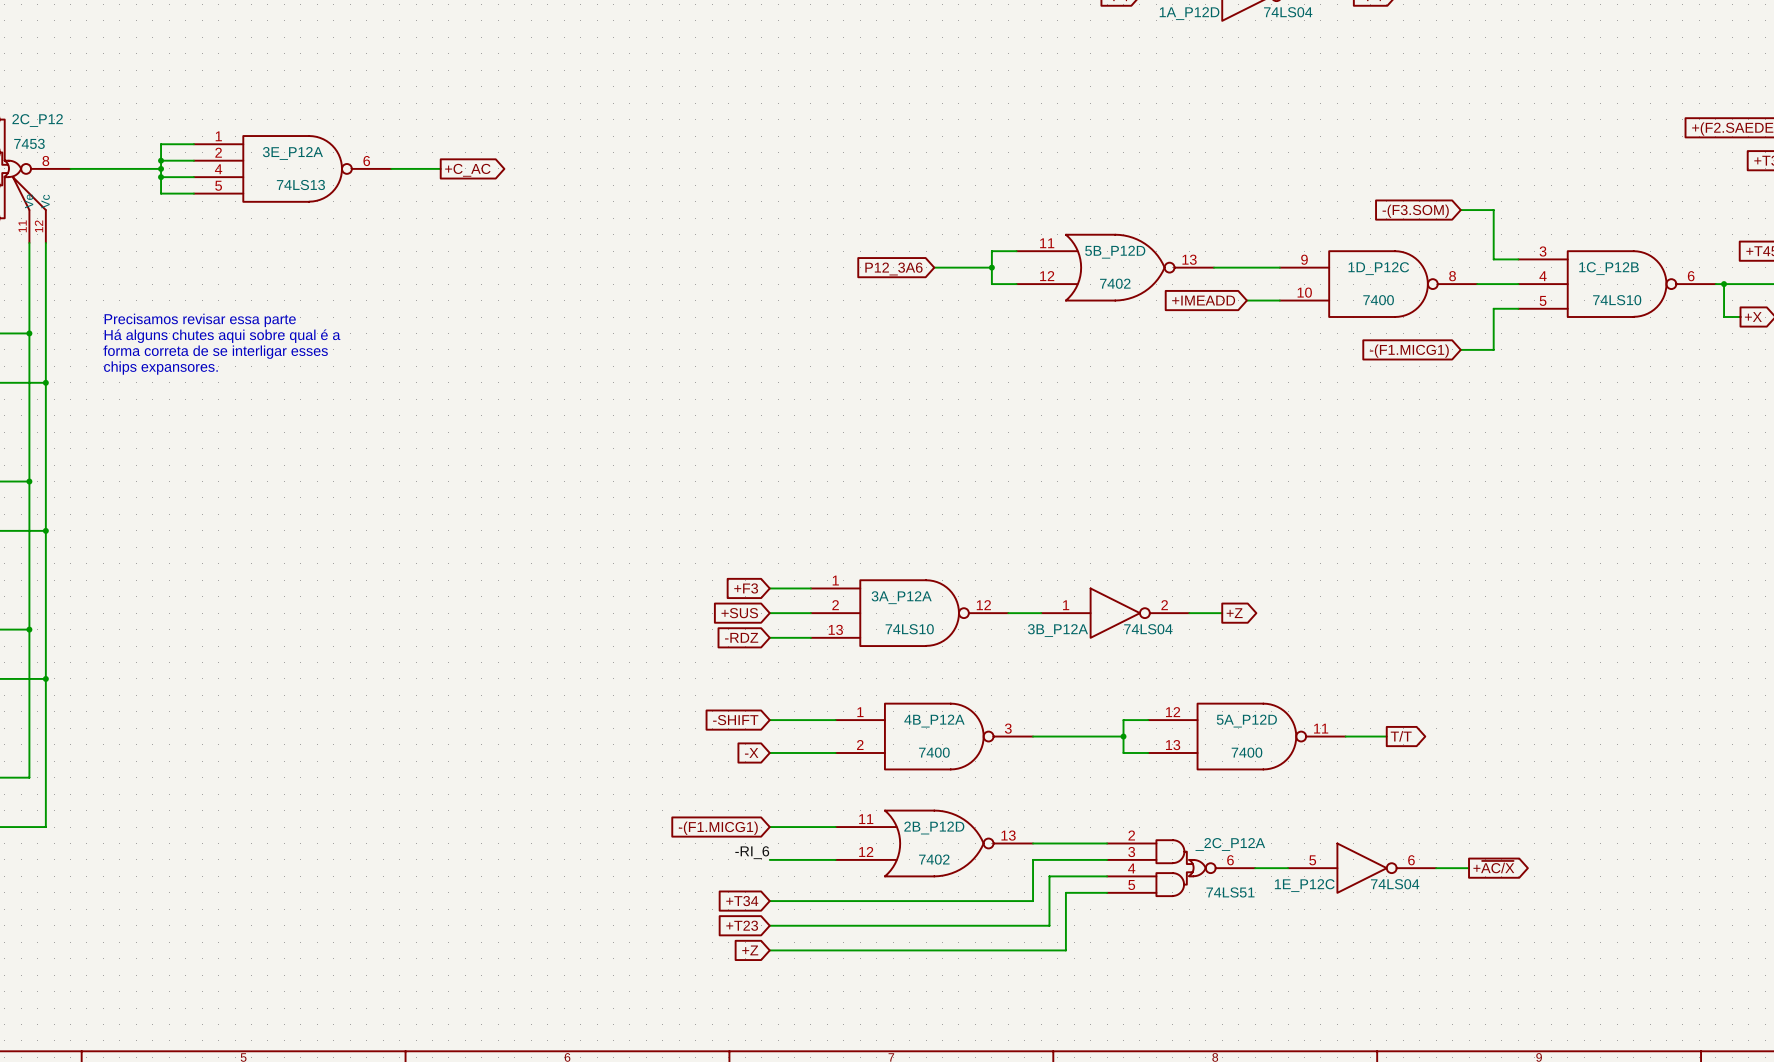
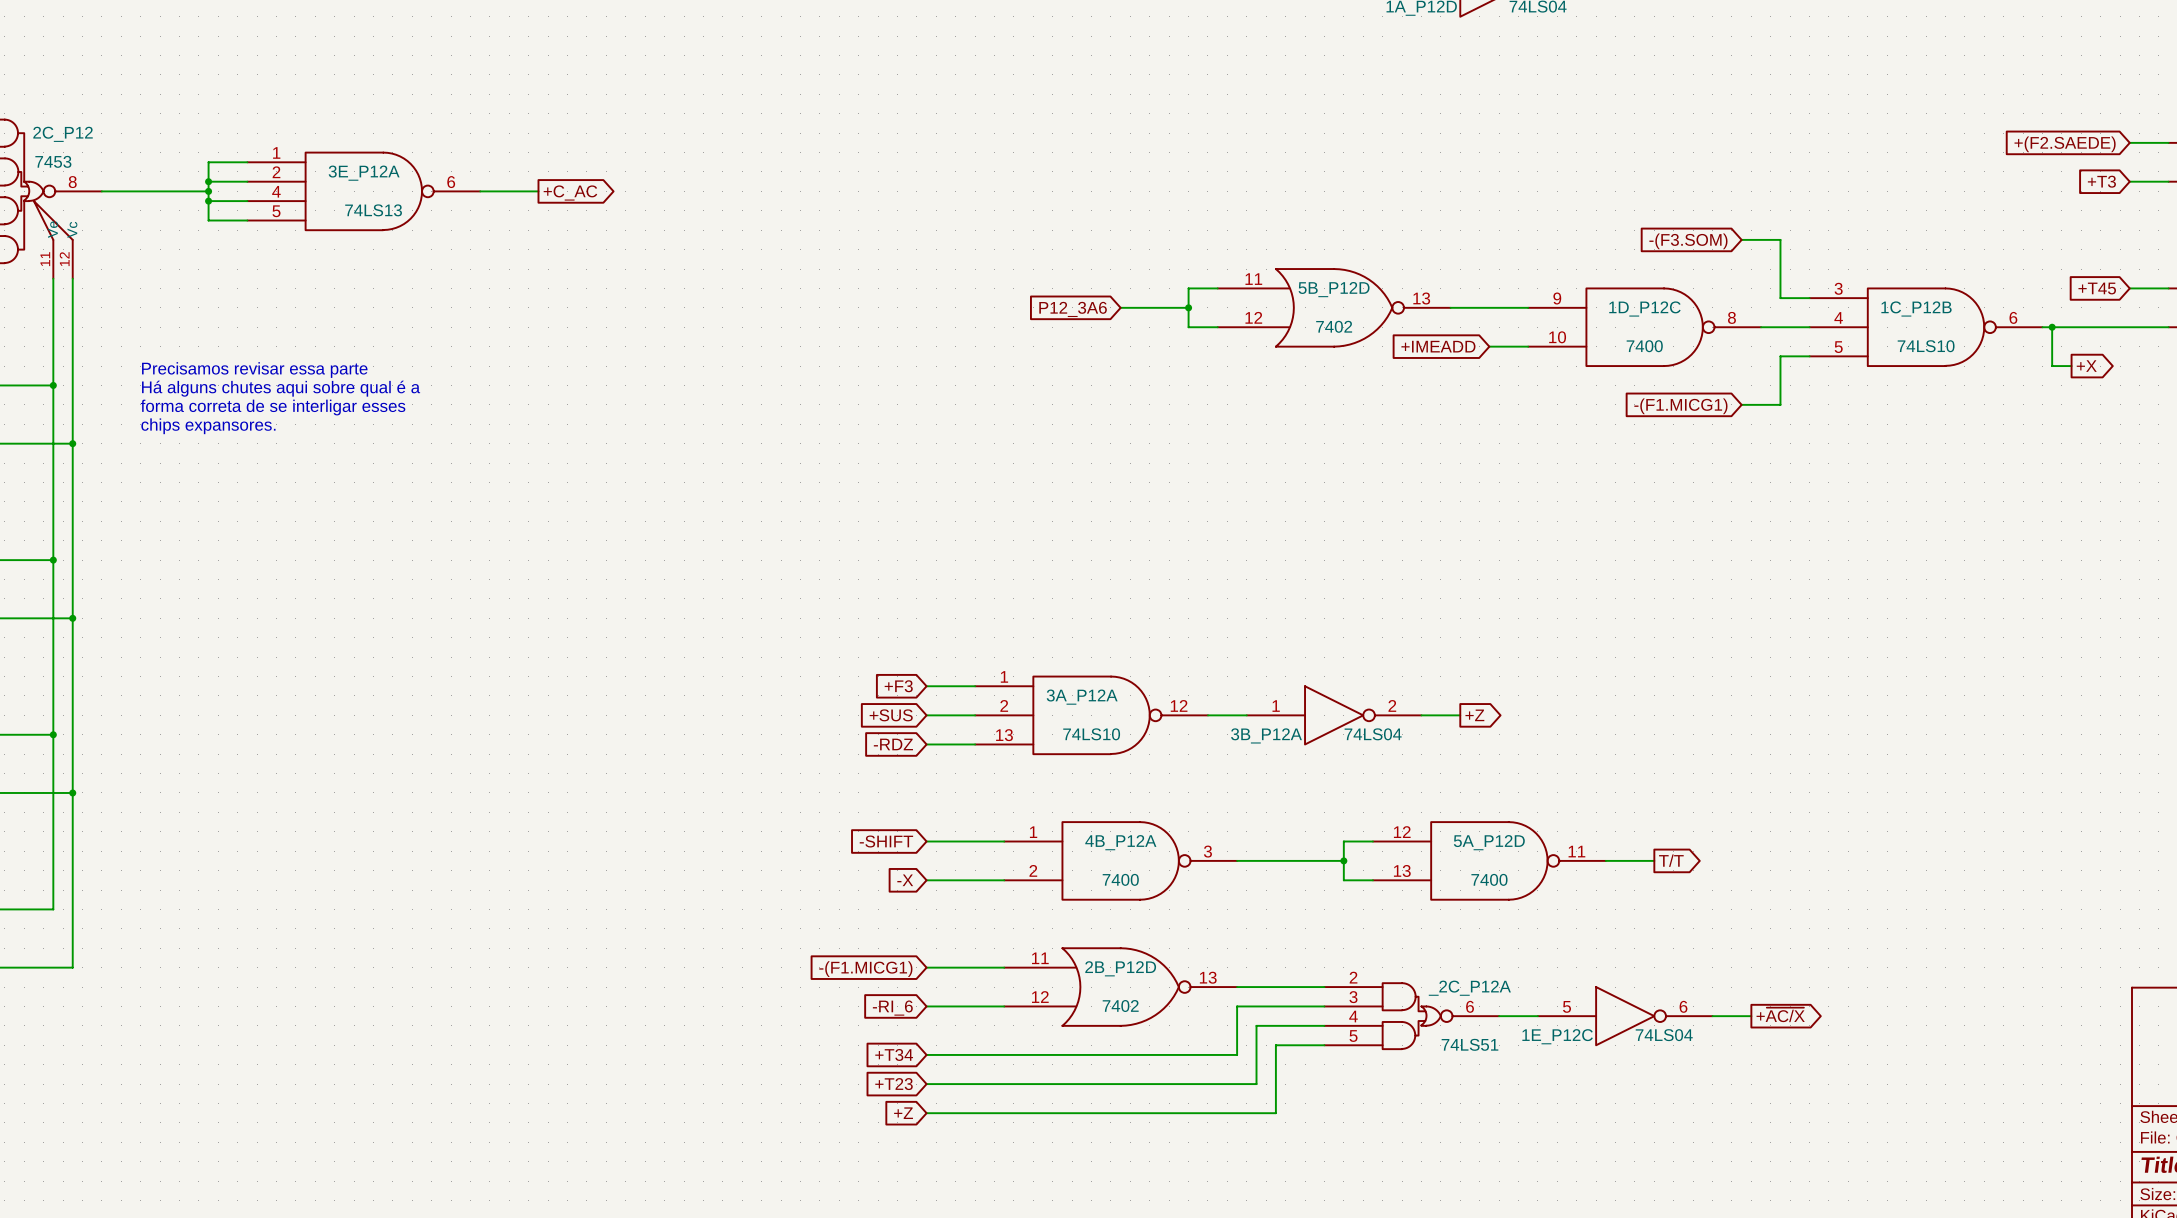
label: -RI_6 (752, 852) -> none
global label: none -> -RI_6 (892, 1008)

